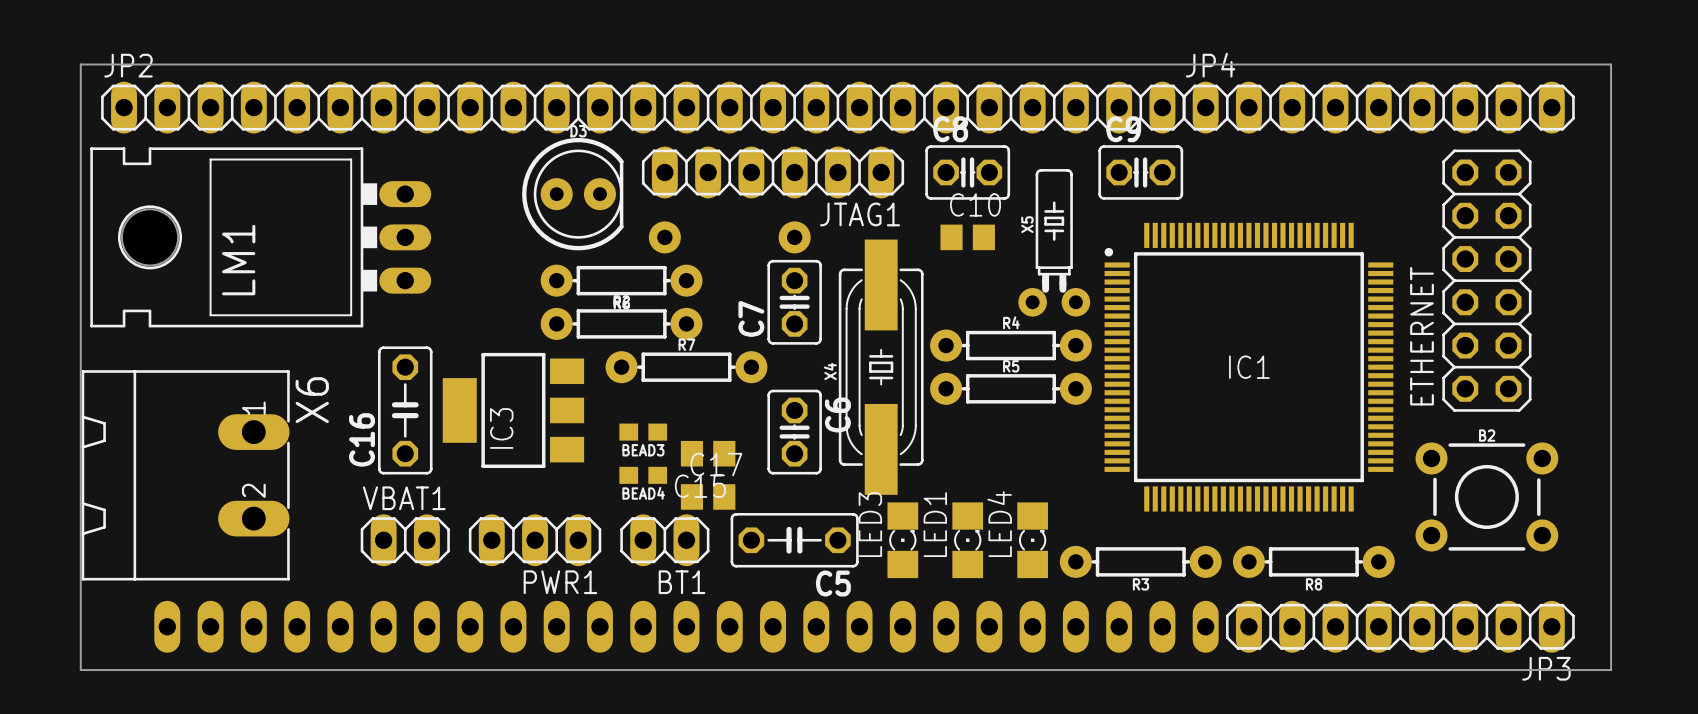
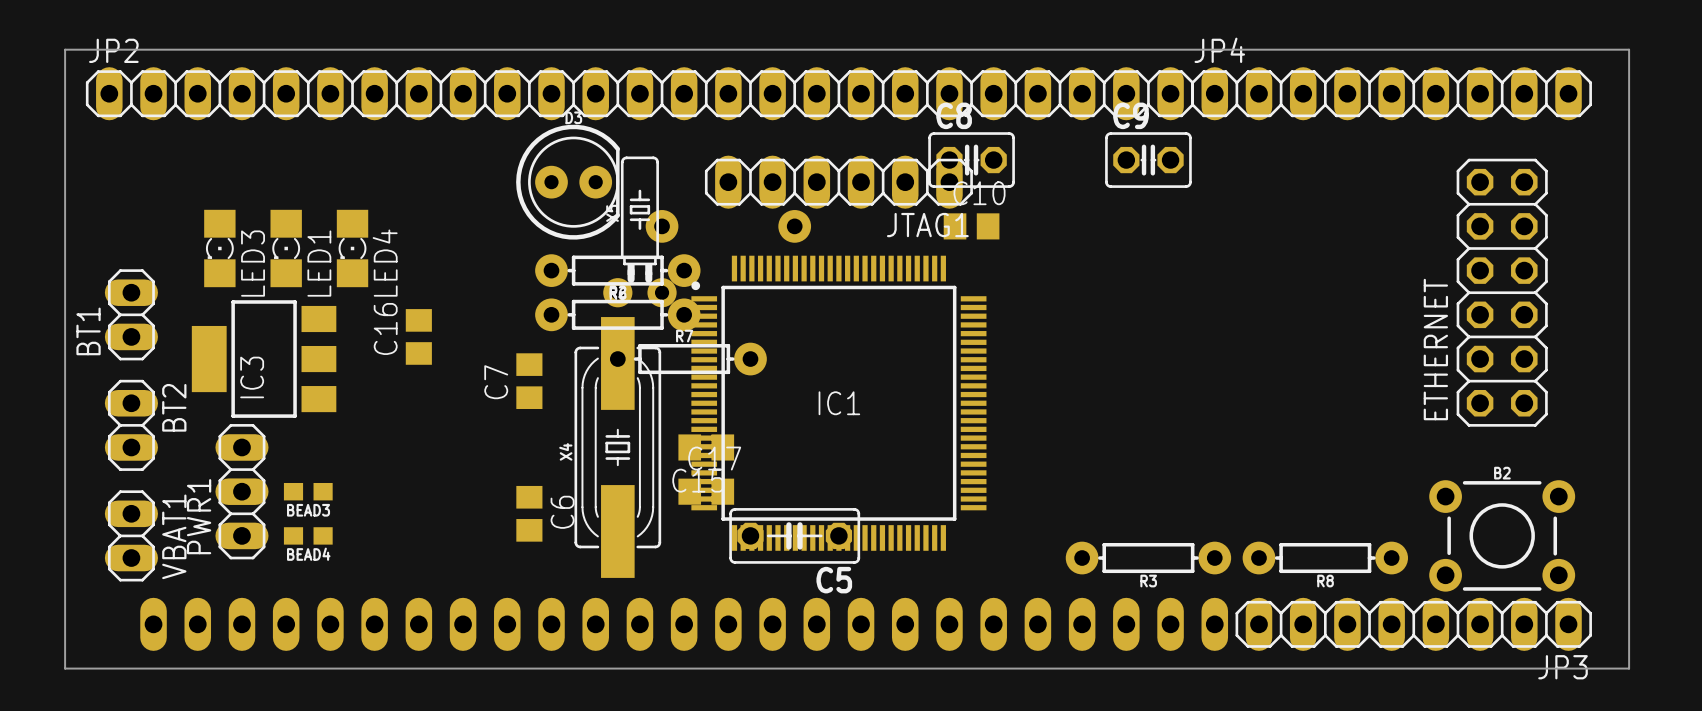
JTAG1 position: (773, 172) -> (838, 182)
LM1: (260, 237) -> none
X5 position: (1054, 242) -> (639, 231)
C7 footprint: [767, 259, 822, 345] -> [516, 353, 543, 410]
ETHERNET position: (1486, 280) -> (1502, 292)
R4: (1010, 345) -> none
C16 footprint: [378, 346, 433, 475] -> [405, 309, 432, 365]
X4 position: (881, 367) -> (617, 447)
IC1 position: (1248, 367) -> (838, 403)
R5: (1010, 388) -> none
C6 footprint: [767, 389, 822, 475] -> [516, 485, 543, 542]
IC3 position: (513, 410) -> (264, 359)
BT2: none -> (131, 425)
BEAD3 position: (643, 432) -> (308, 491)
C16 name position: C16 (362, 439) -> C16 (385, 328)
X6: (185, 475) -> none
BEAD4 position: (643, 475) -> (308, 535)
B2 position: (1486, 496) -> (1502, 535)
VBAT1 rotation: 0° (405, 540) -> 90° clockwise (131, 535)
VBAT1 position: (405, 540) -> (131, 535)
PWR1 rotation: 0° (535, 540) -> 90° clockwise (241, 491)
PWR1 position: (535, 540) -> (241, 491)
BT1 rotation: 0° (664, 540) -> 90° clockwise (131, 314)
BT1 position: (664, 540) -> (131, 314)
LED3 rotation: 0° (902, 540) -> 180° (219, 248)
LED3 position: (902, 540) -> (219, 248)
LED1 rotation: 0° (967, 540) -> 180° (286, 248)
LED1 position: (967, 540) -> (286, 248)
LED4 rotation: 0° (1032, 540) -> 180° (352, 248)
LED4 position: (1032, 540) -> (352, 248)

